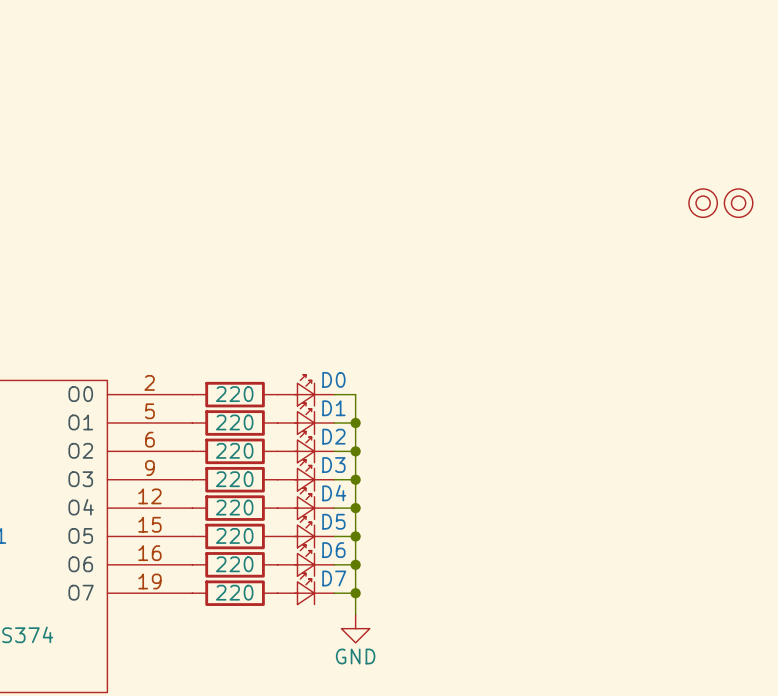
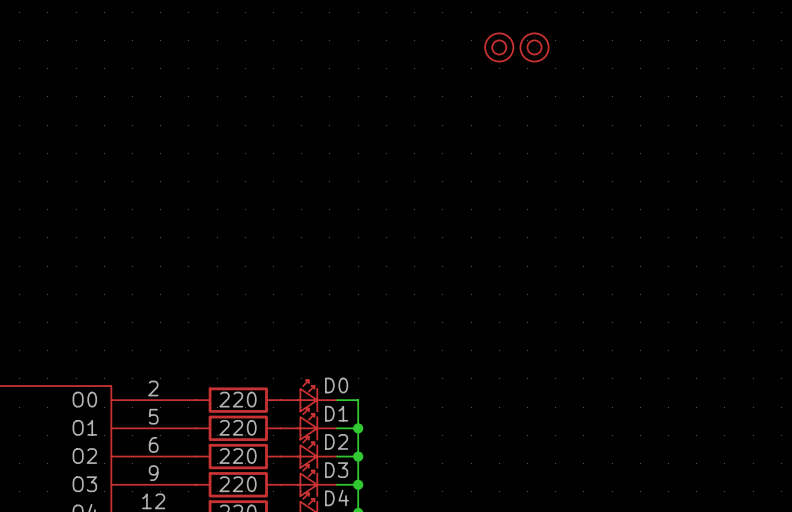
part: none -> (499, 47)
part: none -> (534, 47)
part: (703, 203) -> none
part: (738, 203) -> none

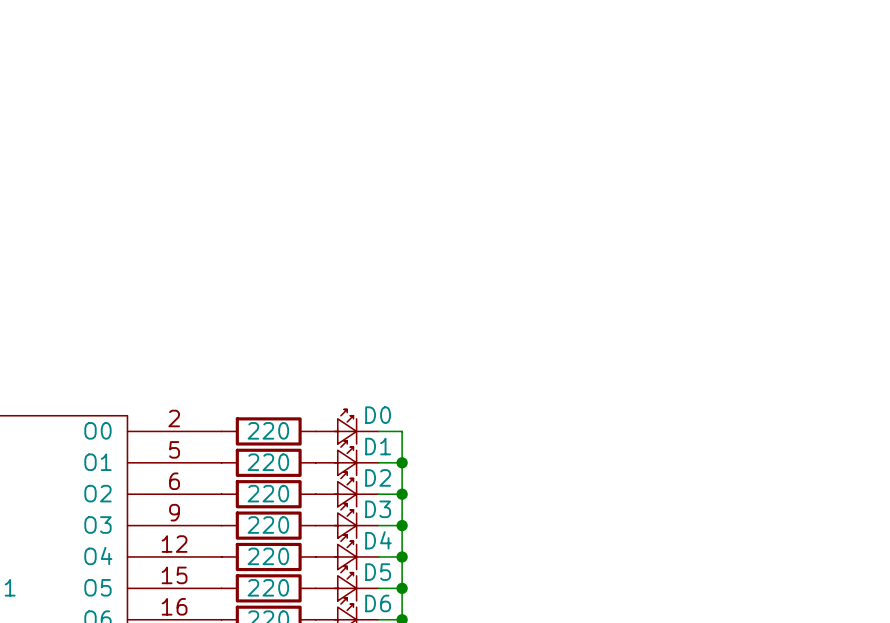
part: (499, 47) -> none
part: (534, 47) -> none

